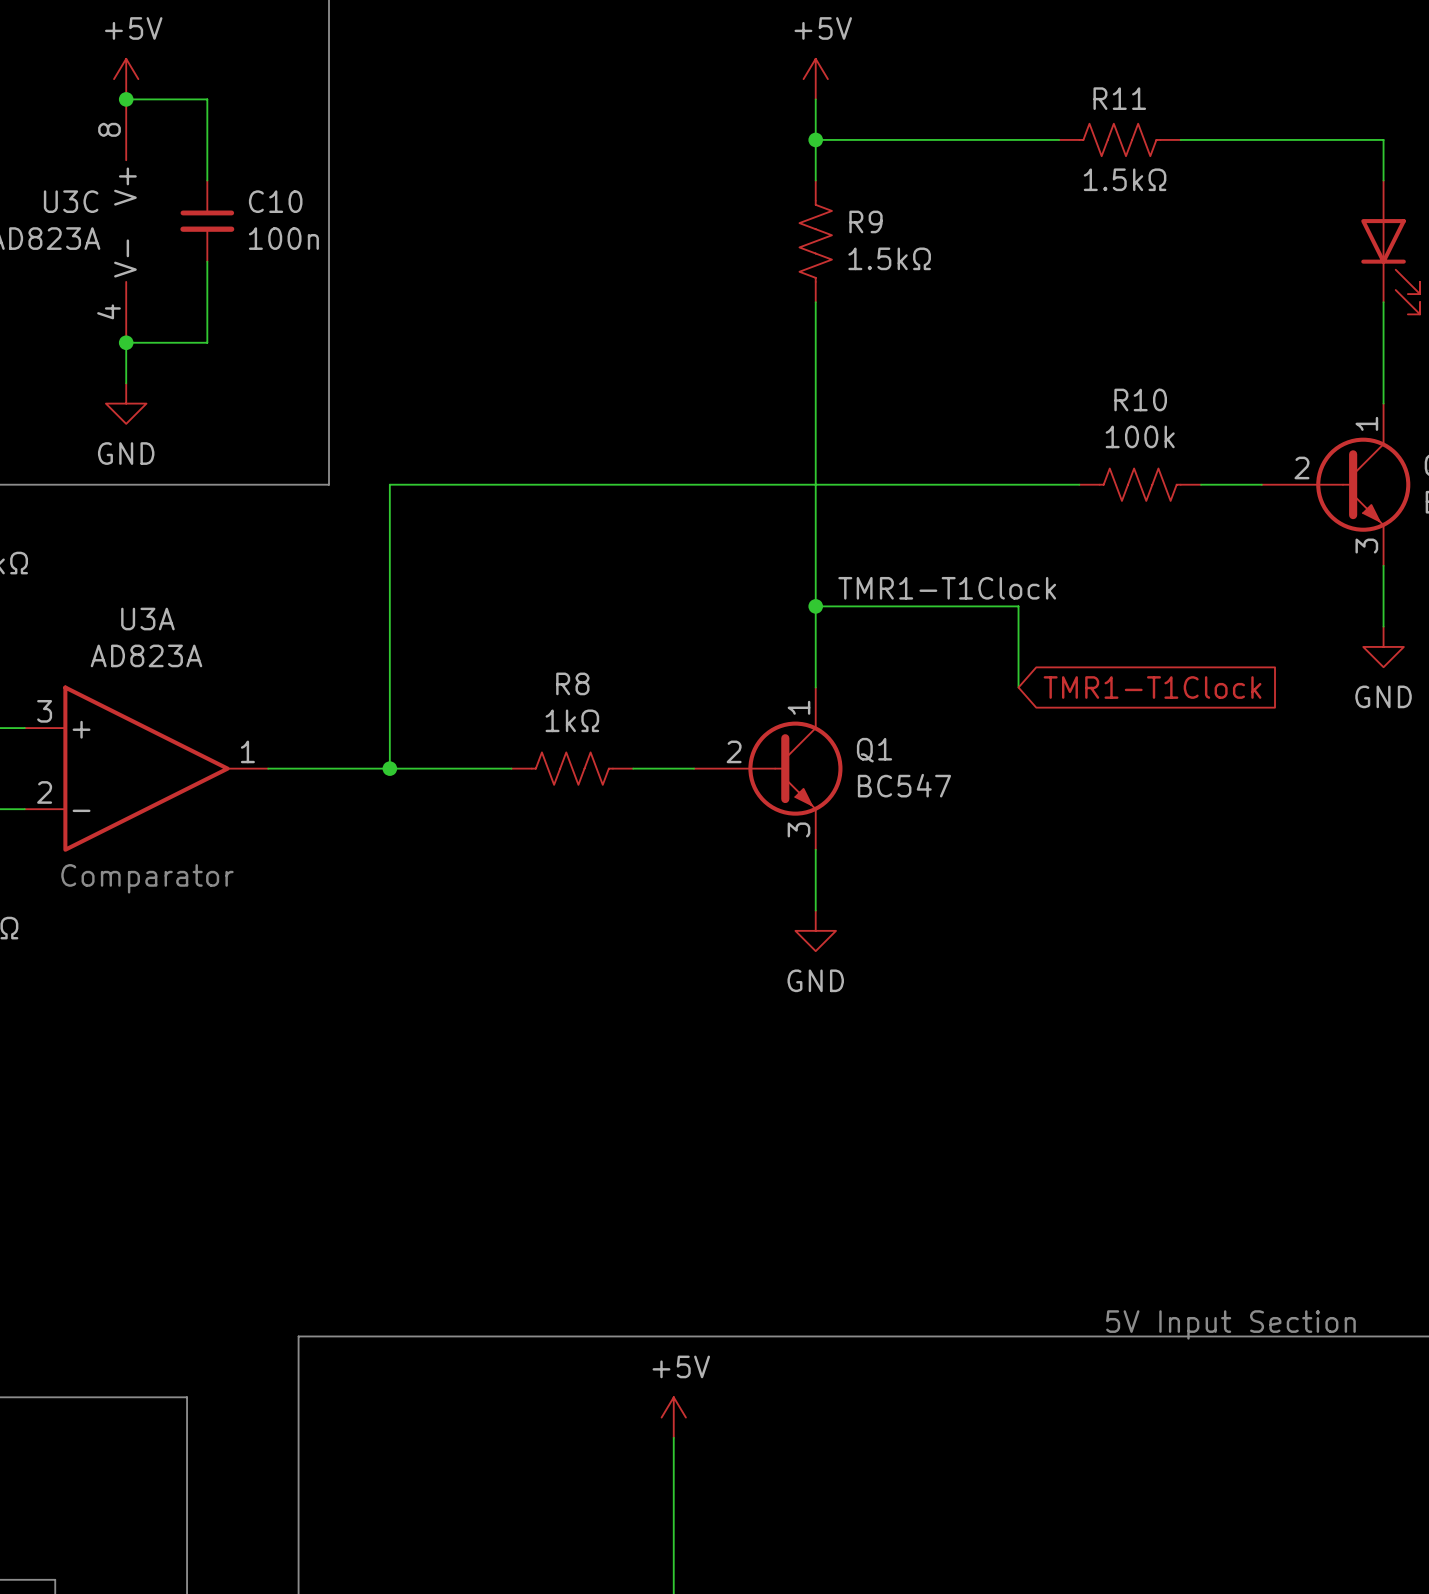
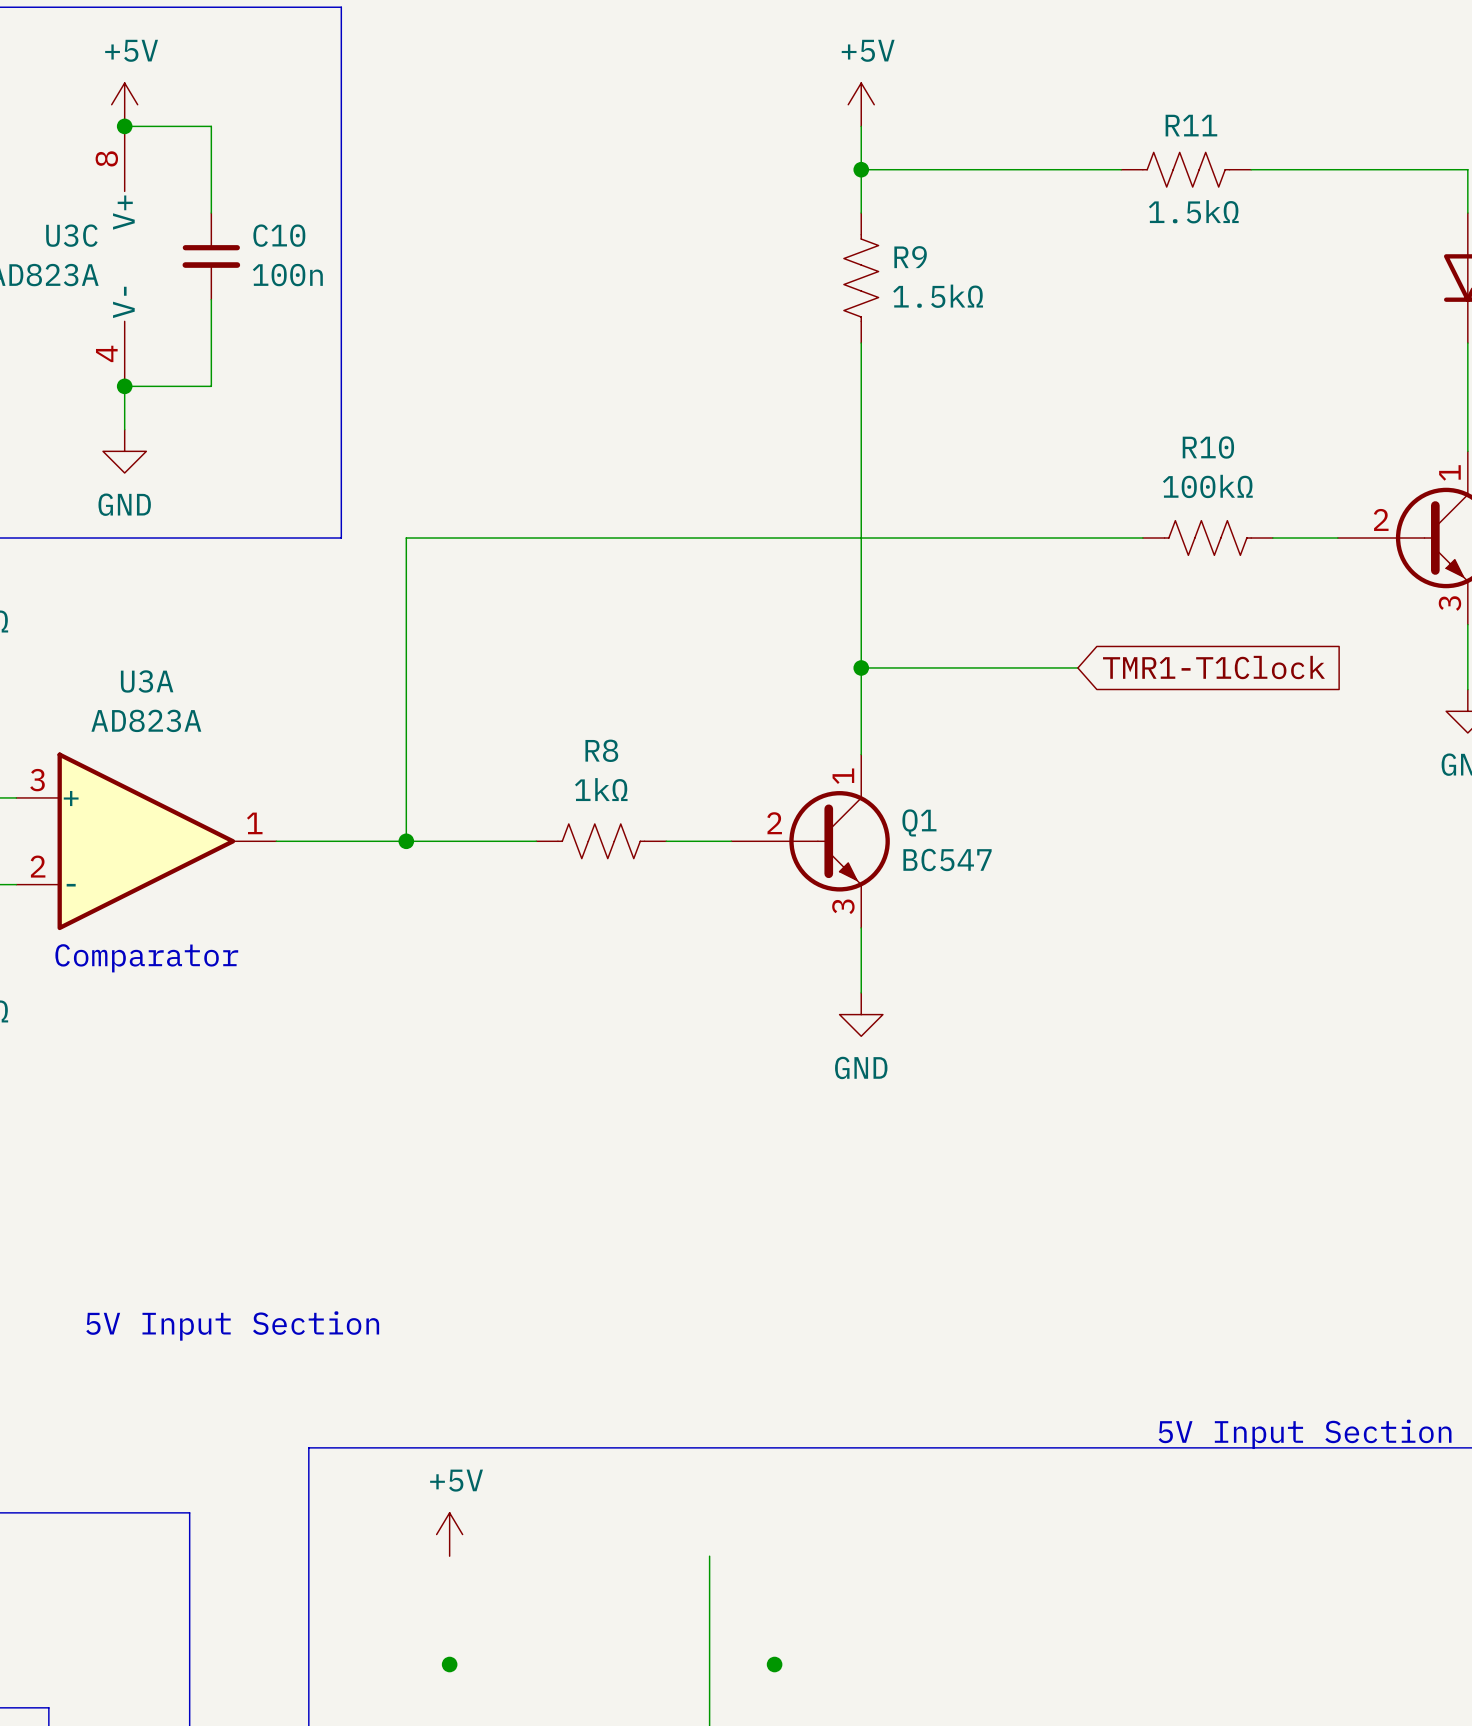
R10 value: 100k (1140, 436) -> 100kΩ (1207, 486)
label: TMR1-T1Clock (947, 588) -> none
wire: (1018, 606) (1018, 687) -> none
global label position: TMR1-T1Clock (1152, 687) -> TMR1-T1Clock (1213, 667)
text: none -> 5V Input Section (232, 1325)
power symbol position: +5V (673, 1417) -> +5V (449, 1534)
junction: none -> (449, 1664)
junction: none -> (774, 1664)

